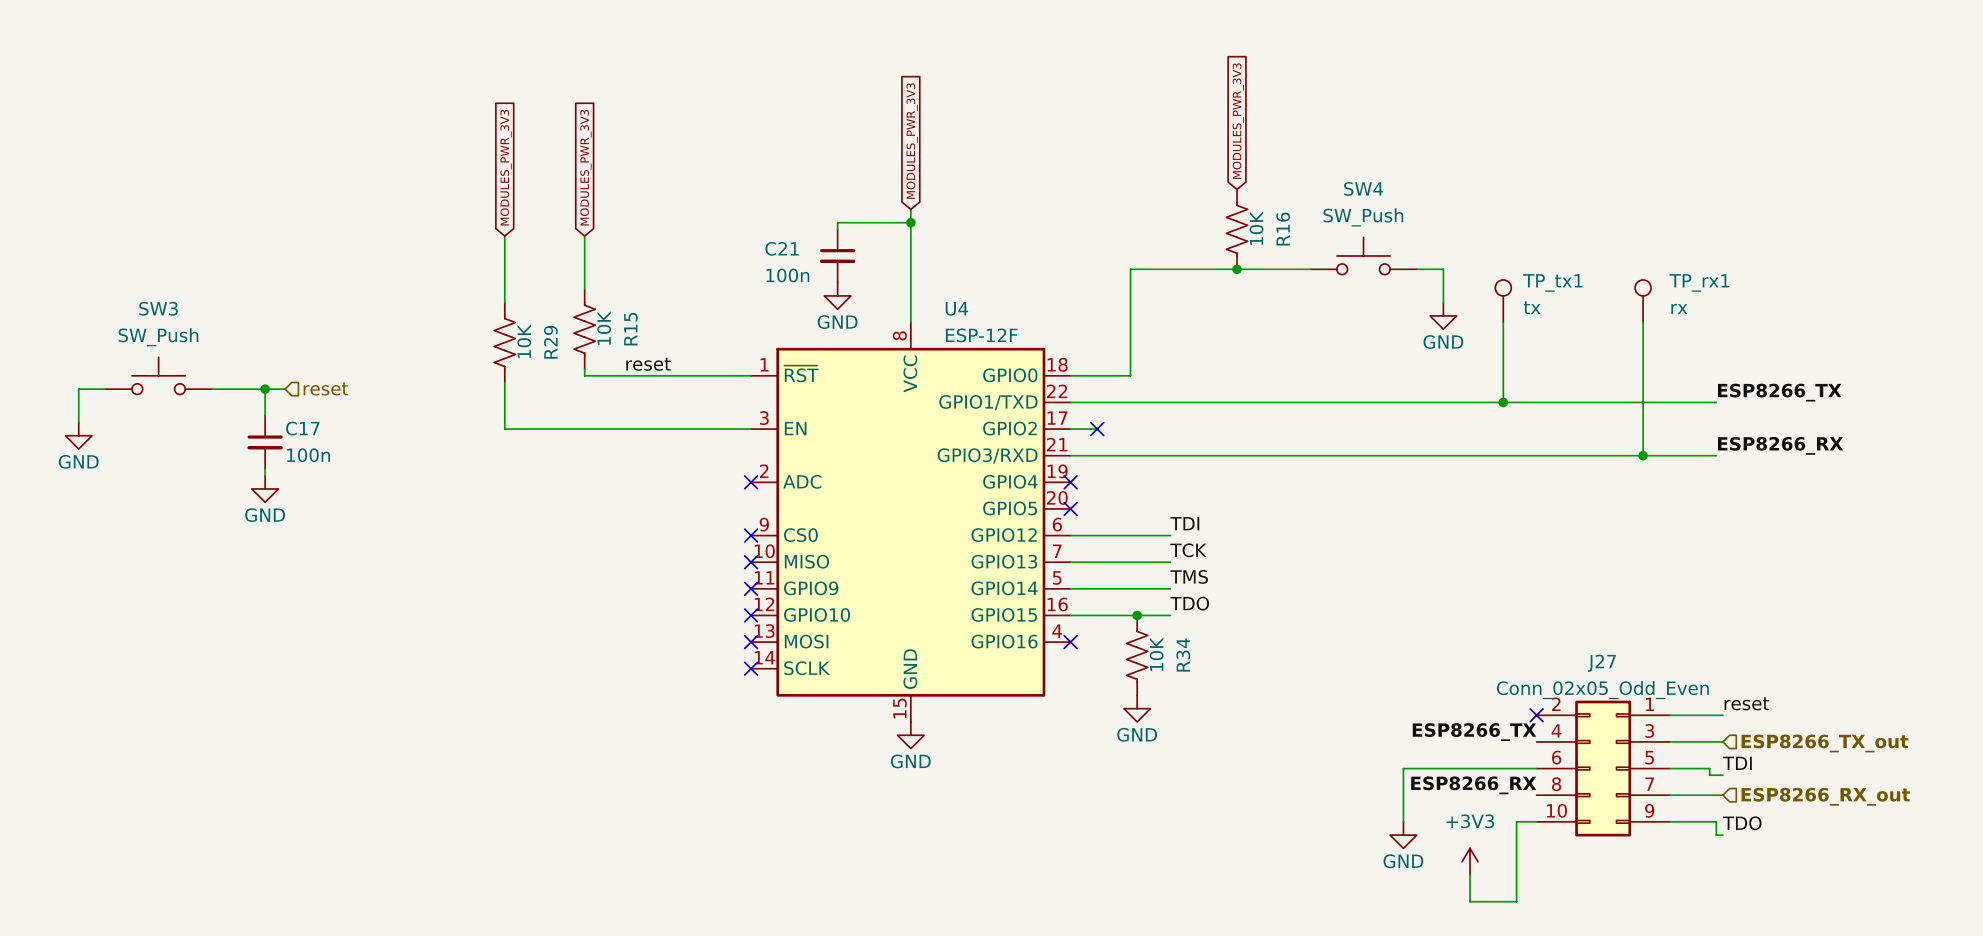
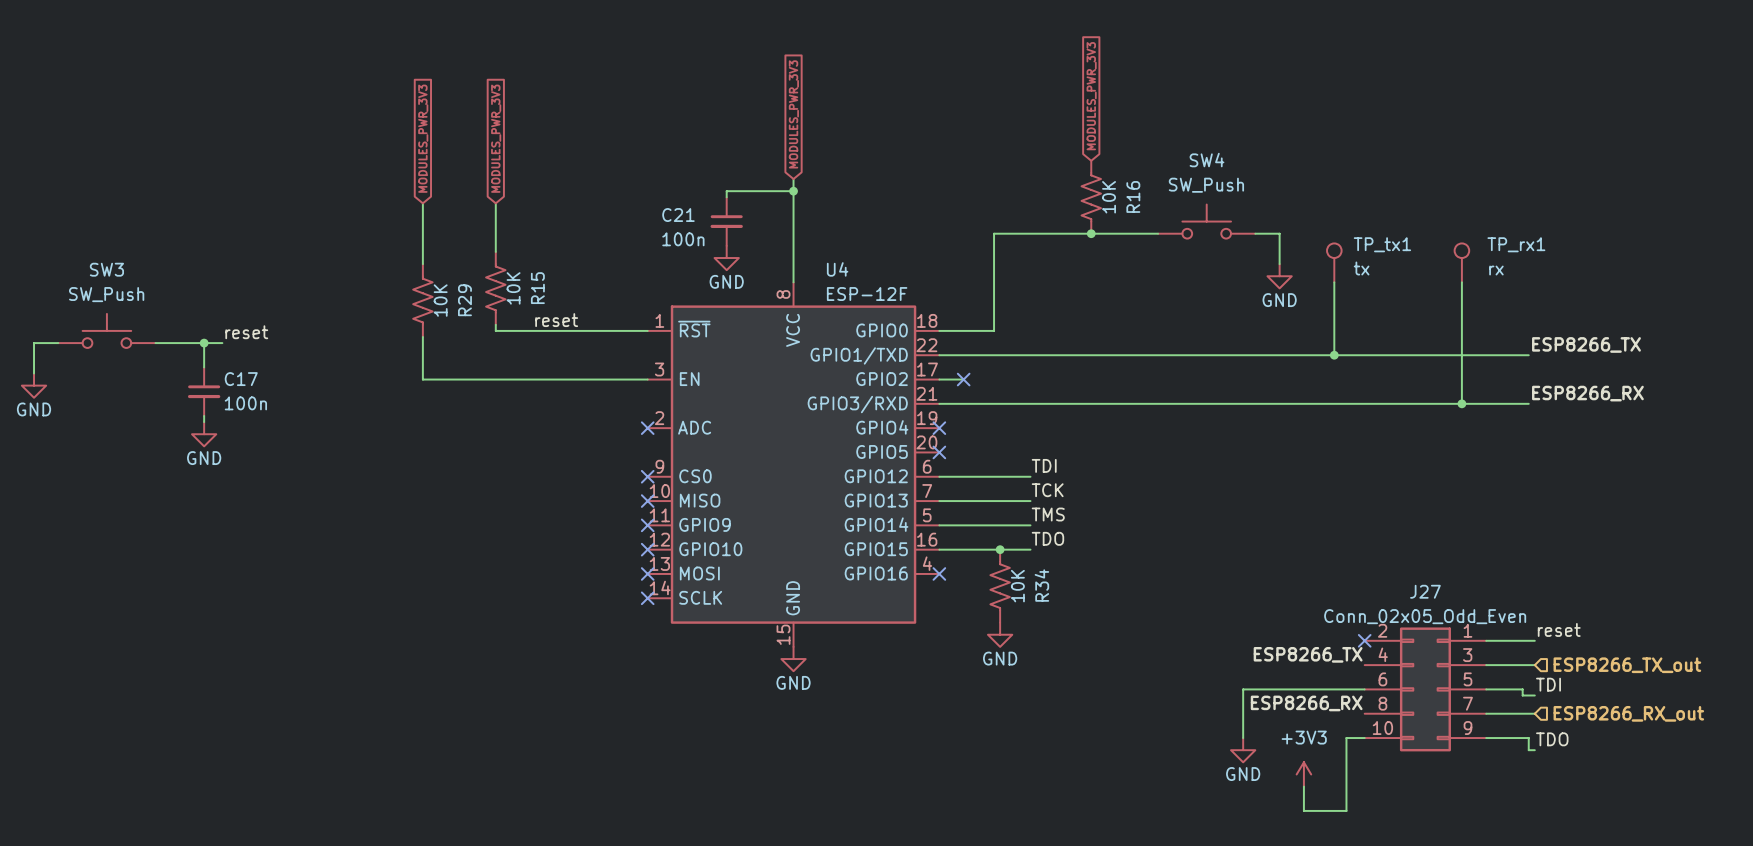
label: none -> reset (246, 332)
hierarchical label: reset (325, 389) -> none

